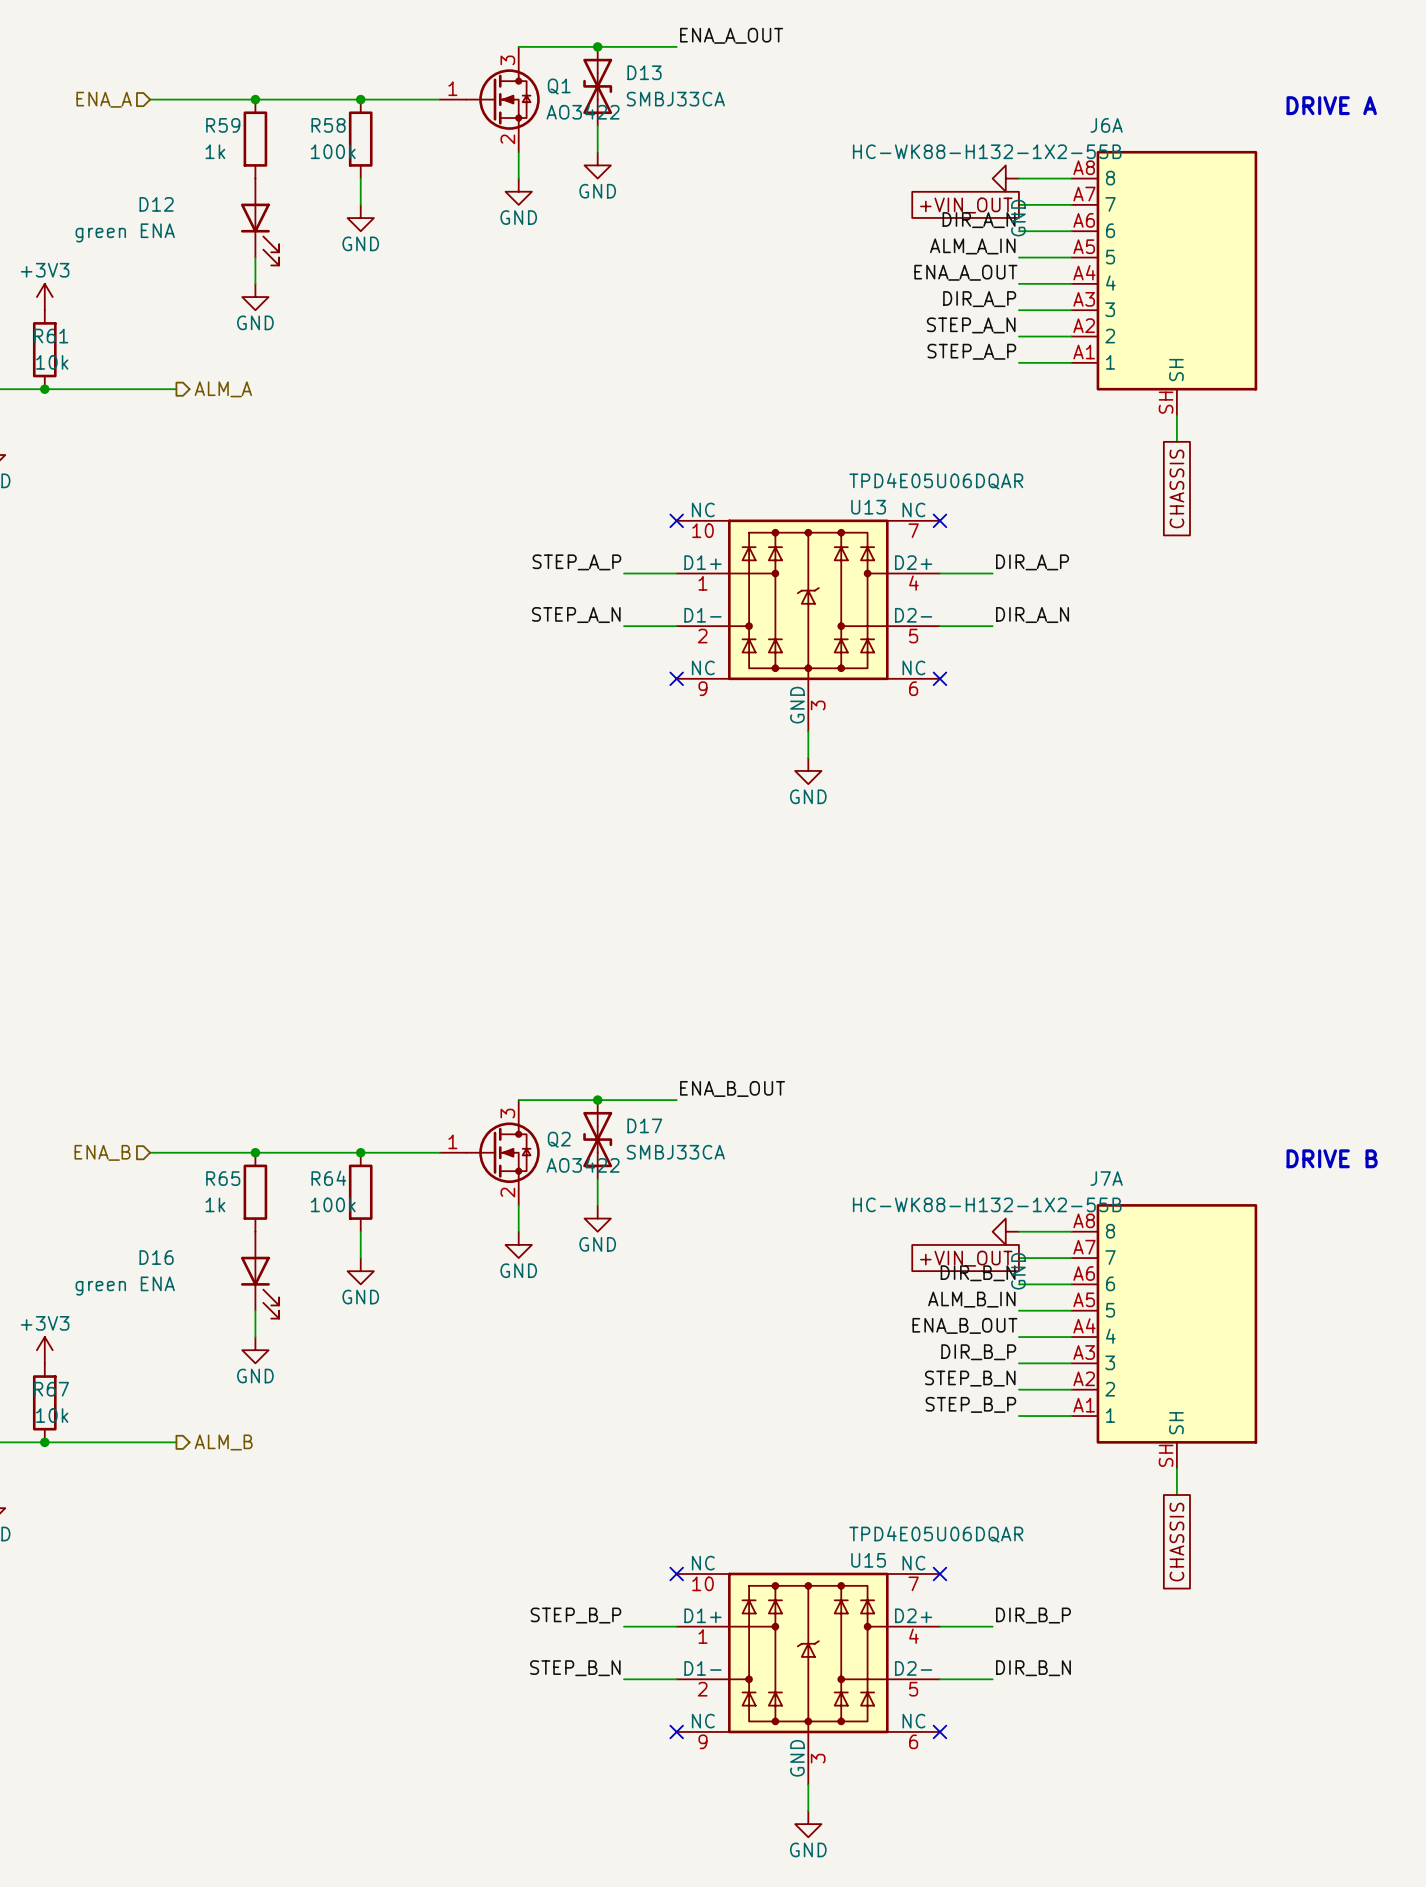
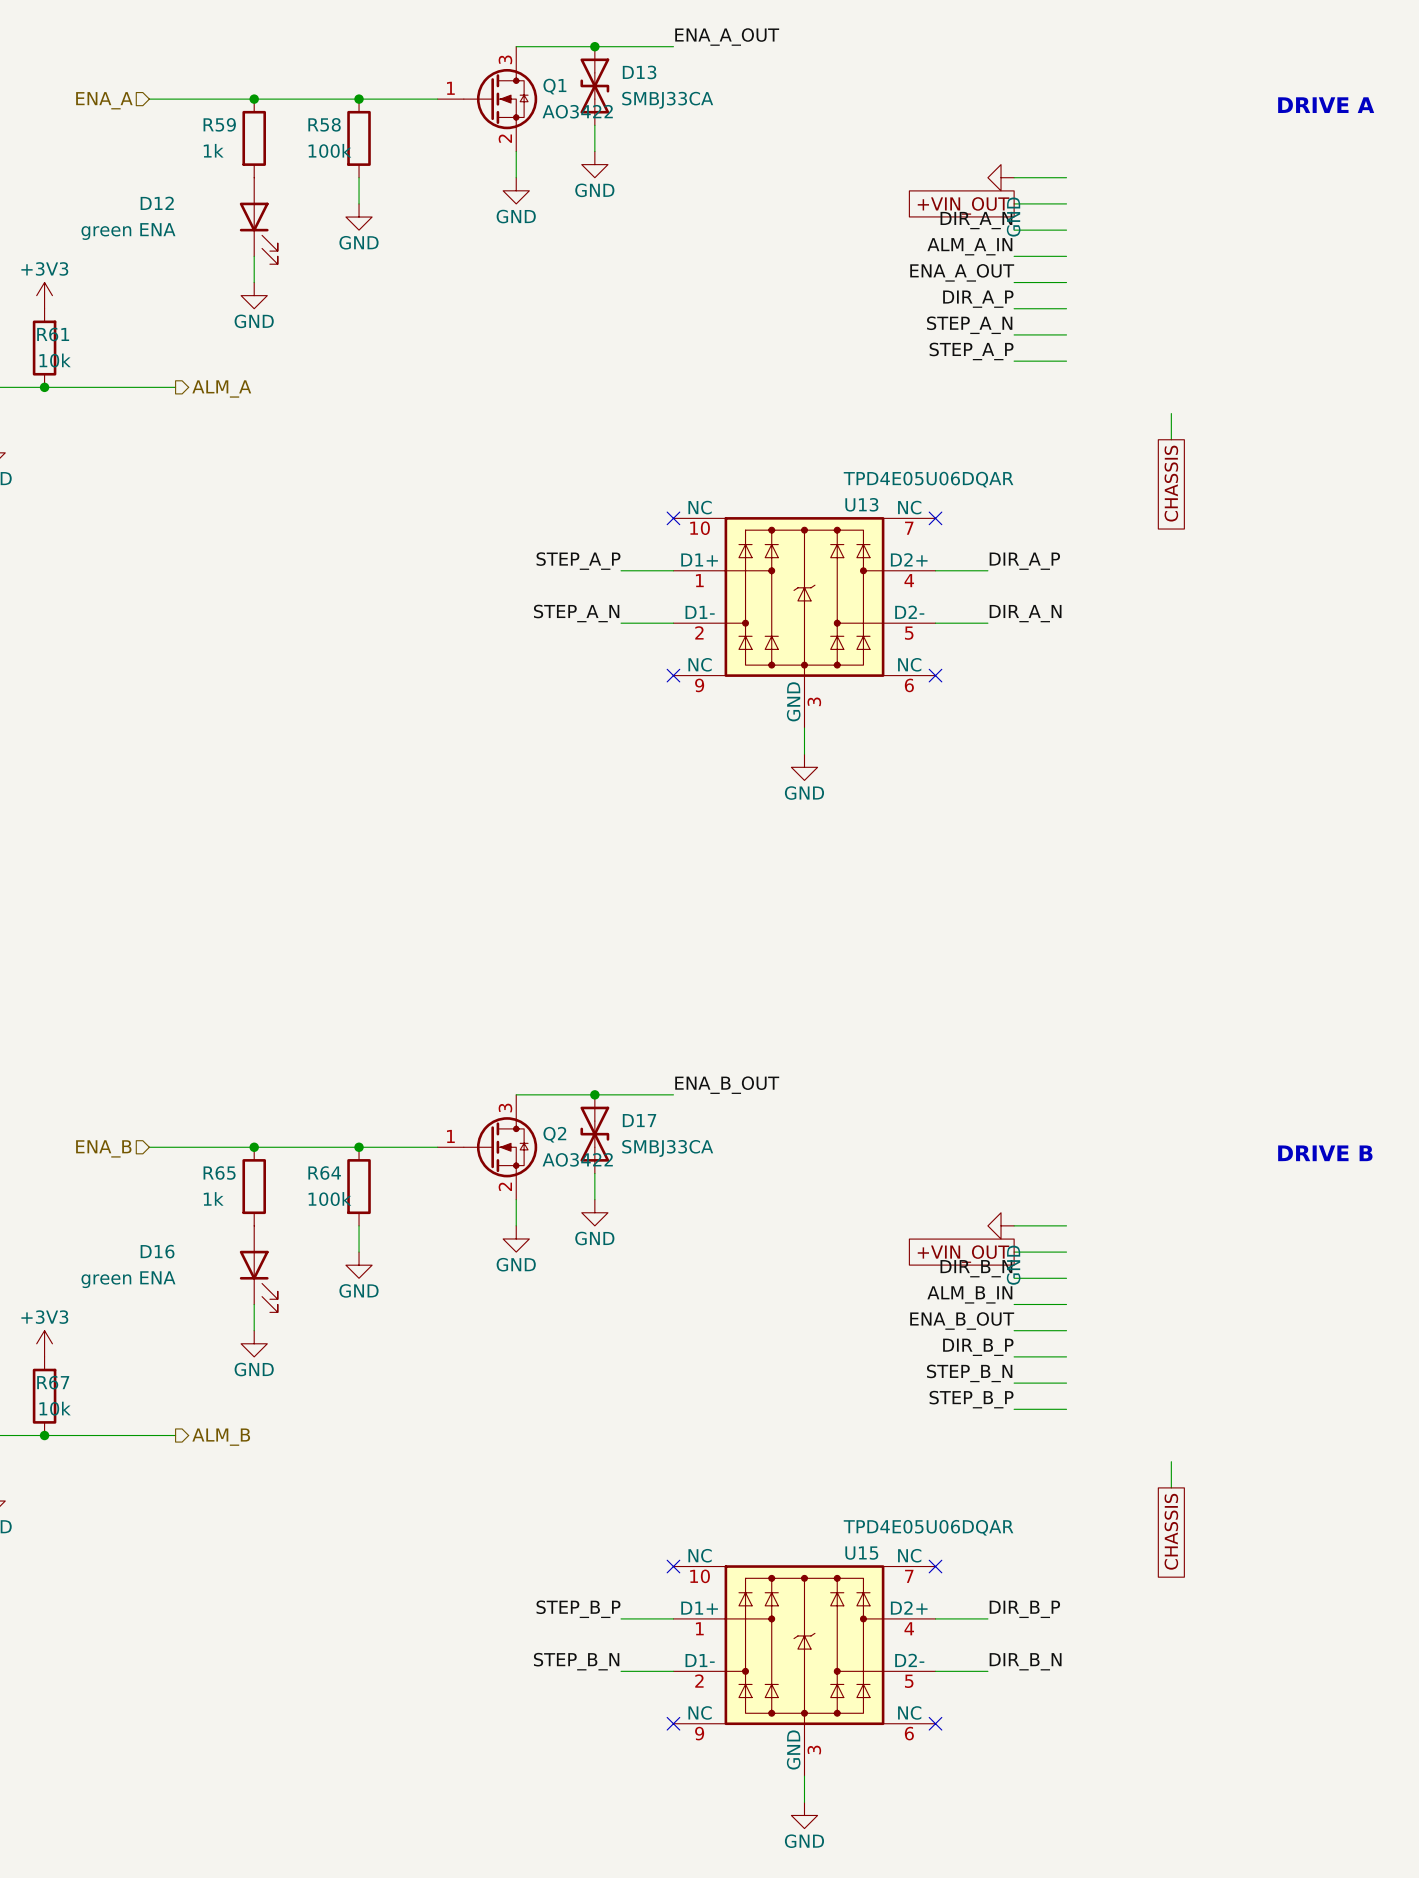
J6A: HC-WK88-H132-1X2-55B (1164, 283) -> none
J7A: HC-WK88-H132-1X2-55B (1164, 1336) -> none

